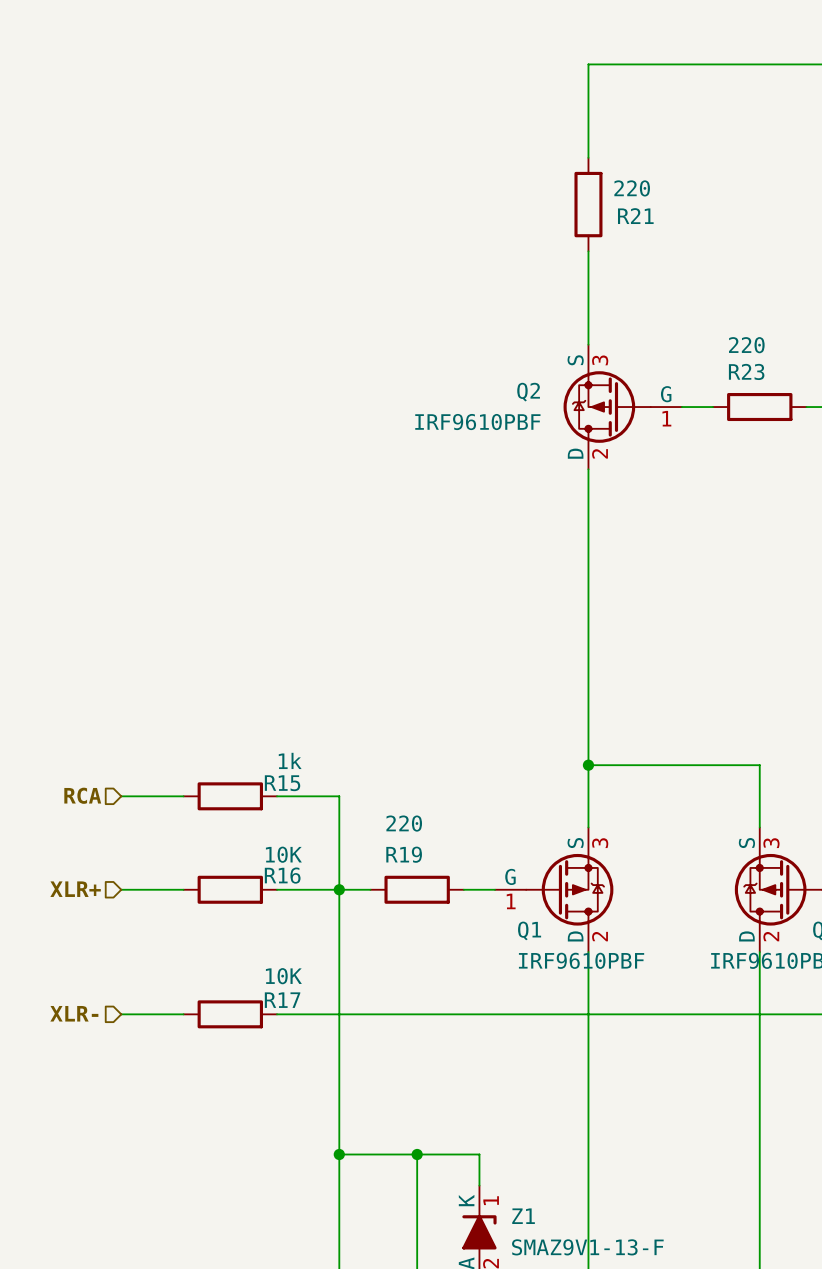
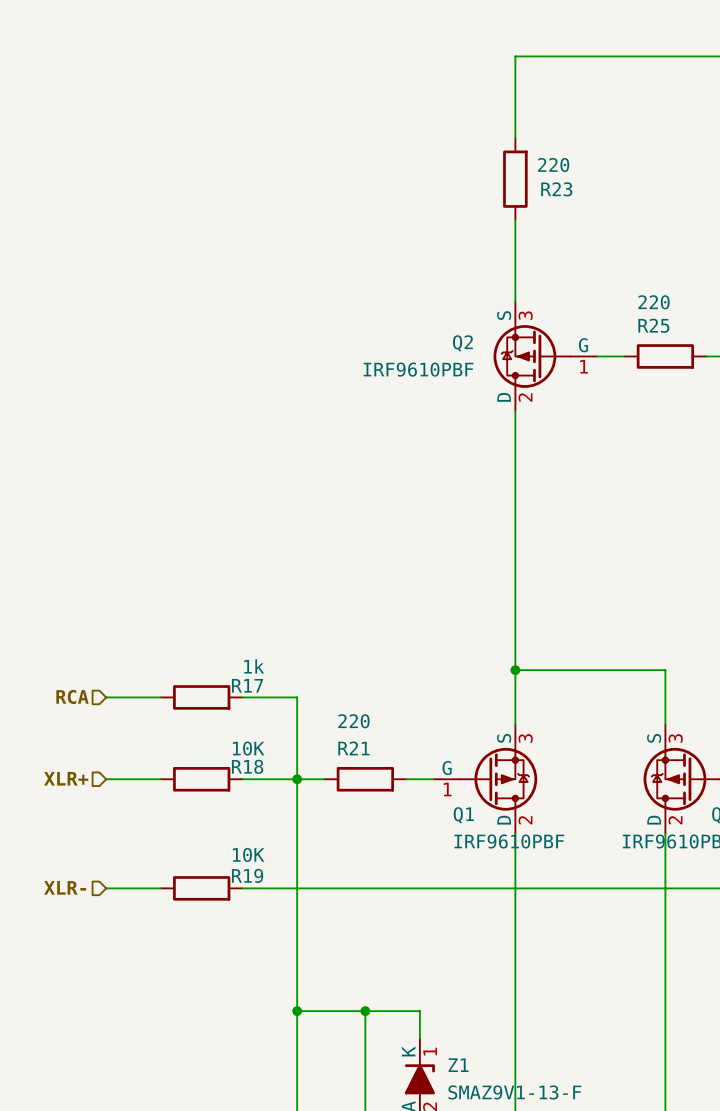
R21 name: R21 (635, 216) -> R23 (556, 189)
R23 name: R23 (746, 371) -> R25 (653, 325)
R15 name: R15 (282, 783) -> R17 (247, 685)
R19 name: R19 (404, 854) -> R21 (353, 748)
R16 name: R16 (282, 875) -> R18 (247, 766)
R17 name: R17 (282, 1000) -> R19 (247, 875)

